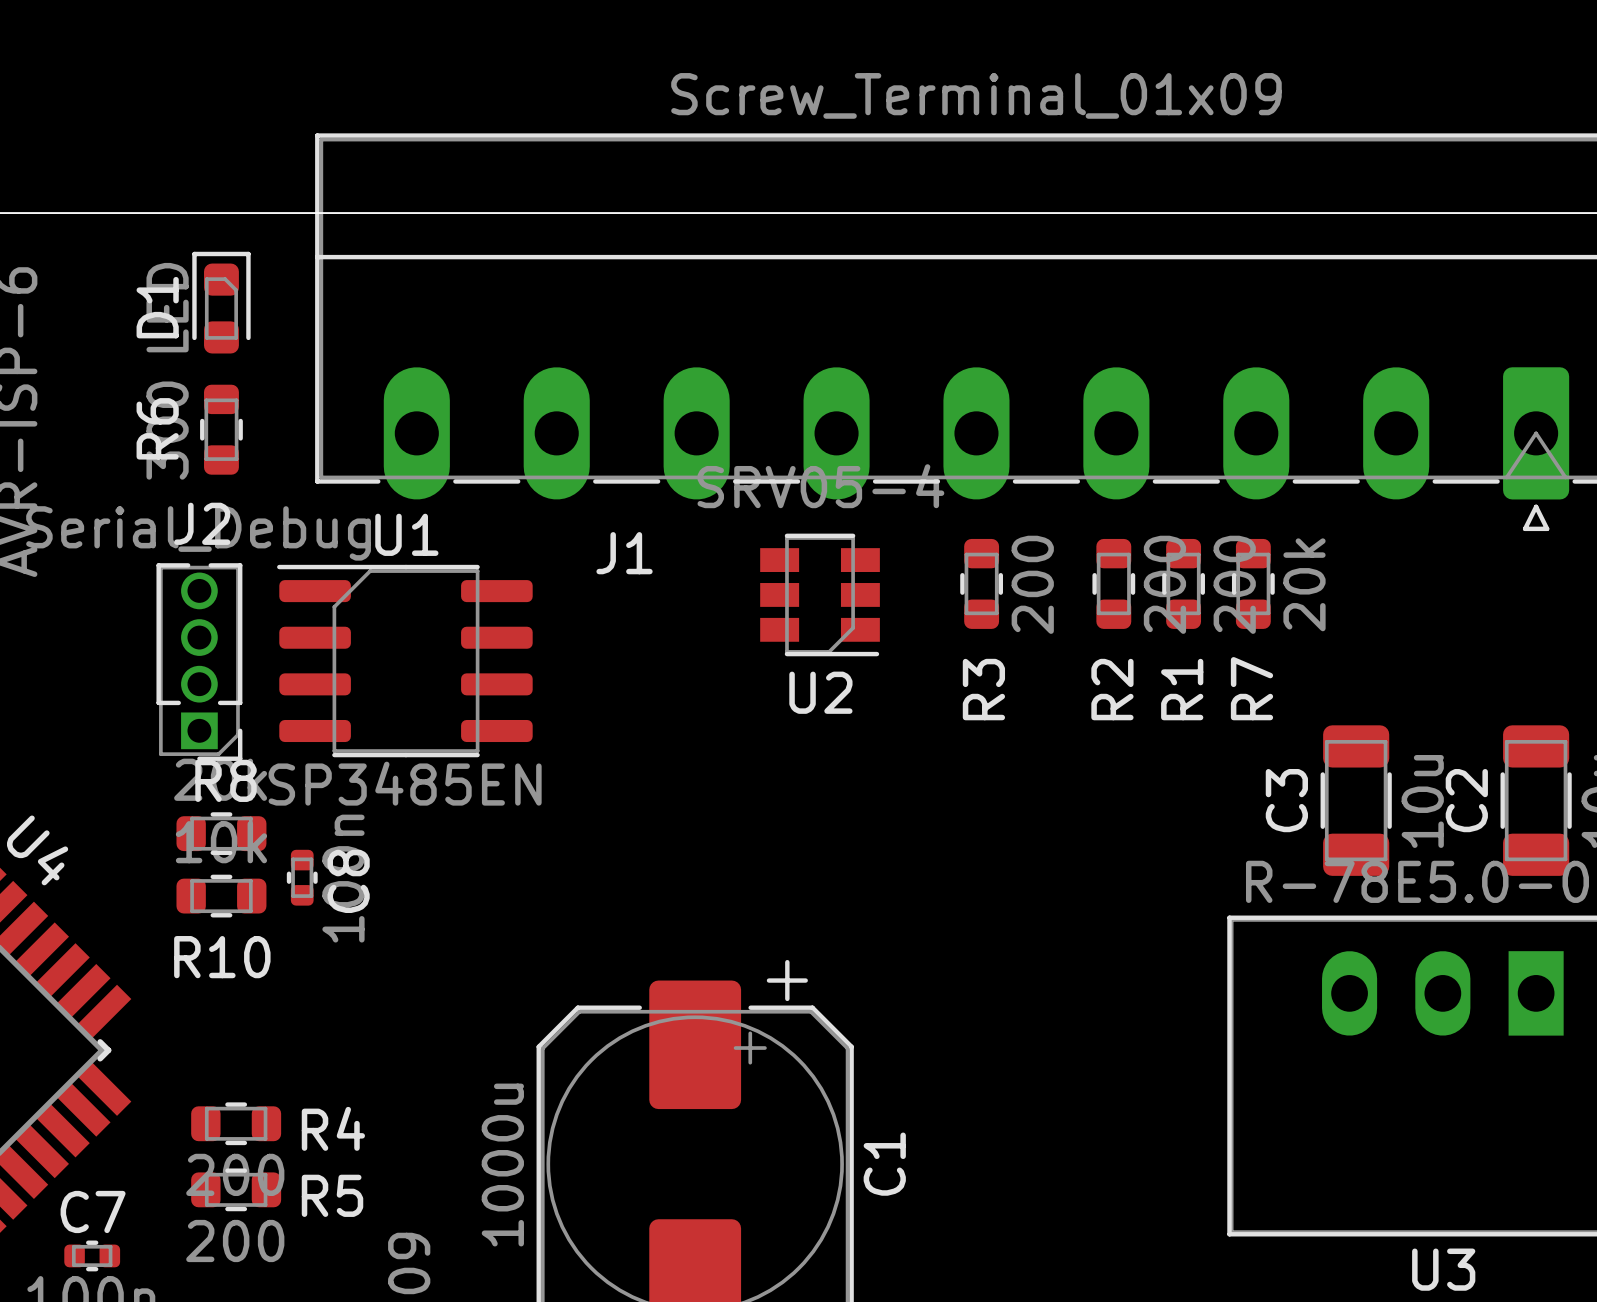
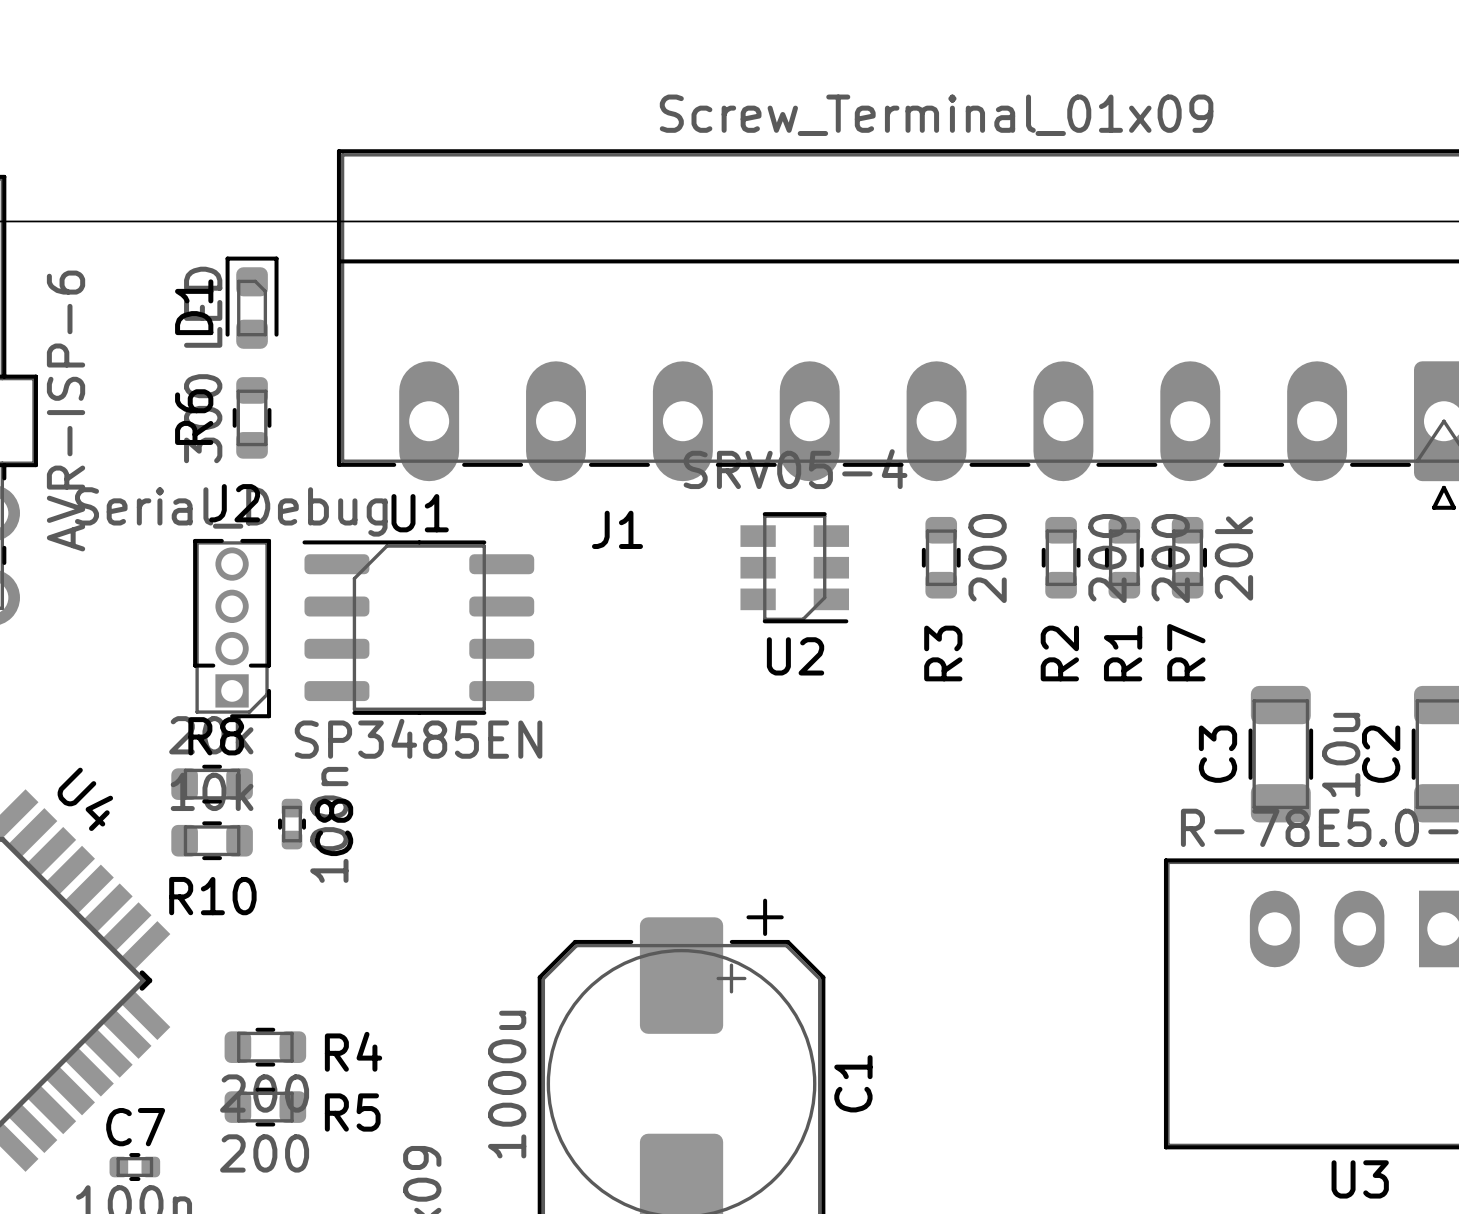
R8 position: (221, 833) -> (212, 784)
C8 position: (302, 877) -> (292, 824)
R10 position: (221, 896) -> (212, 840)

